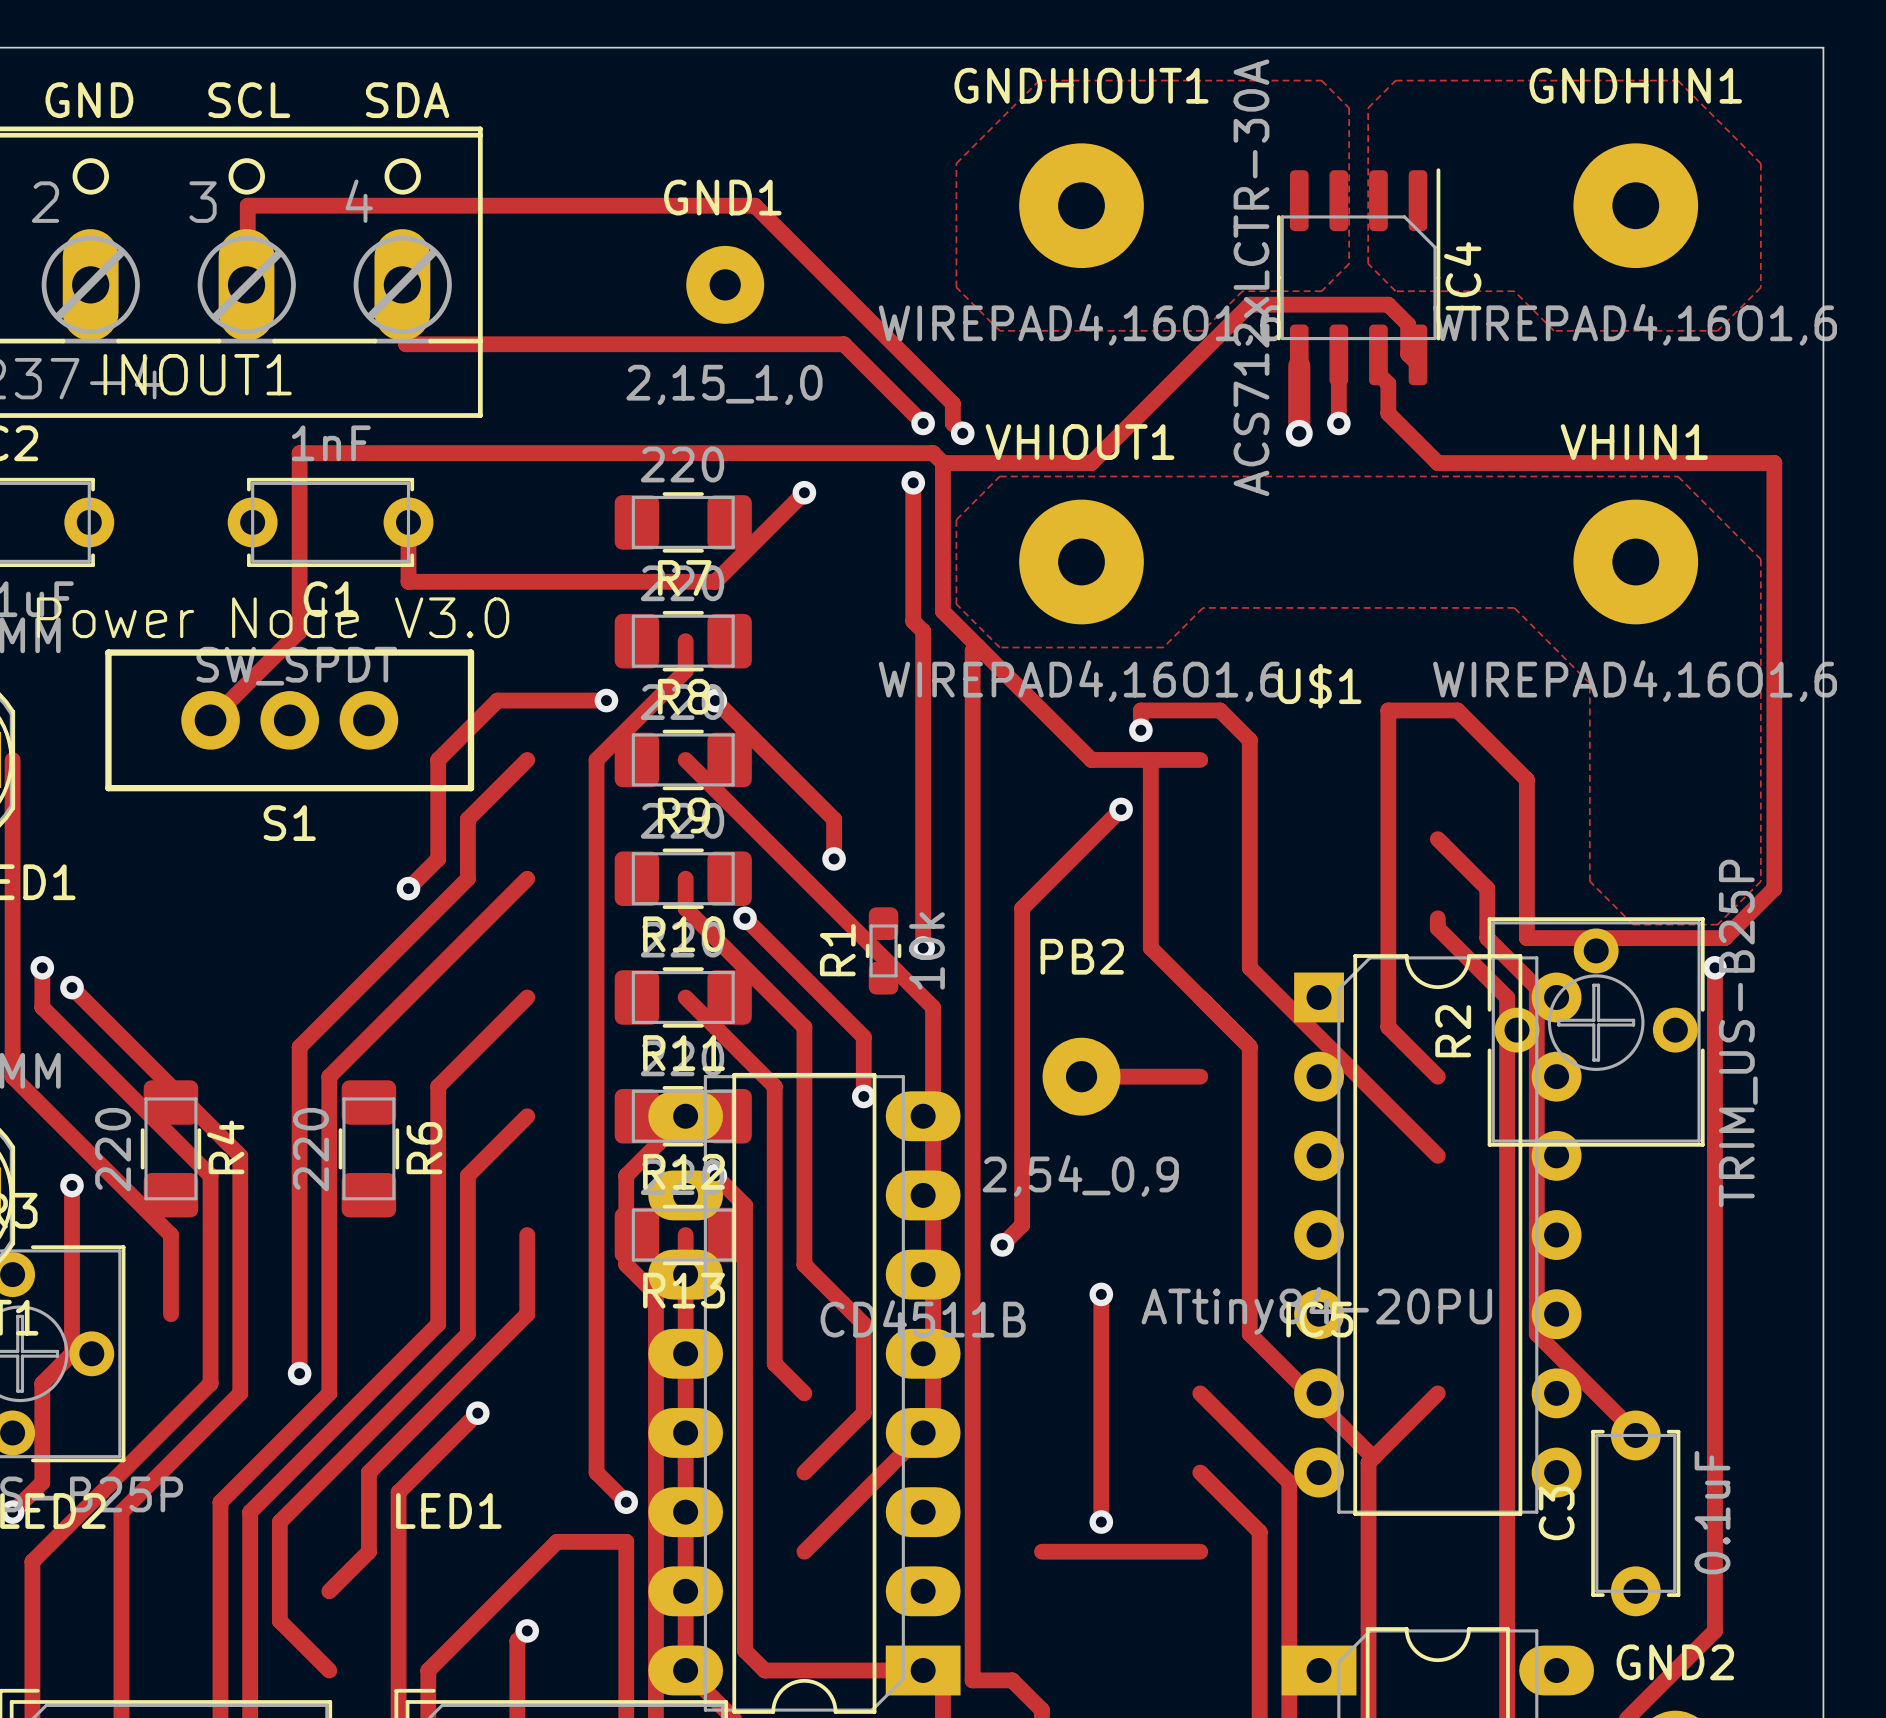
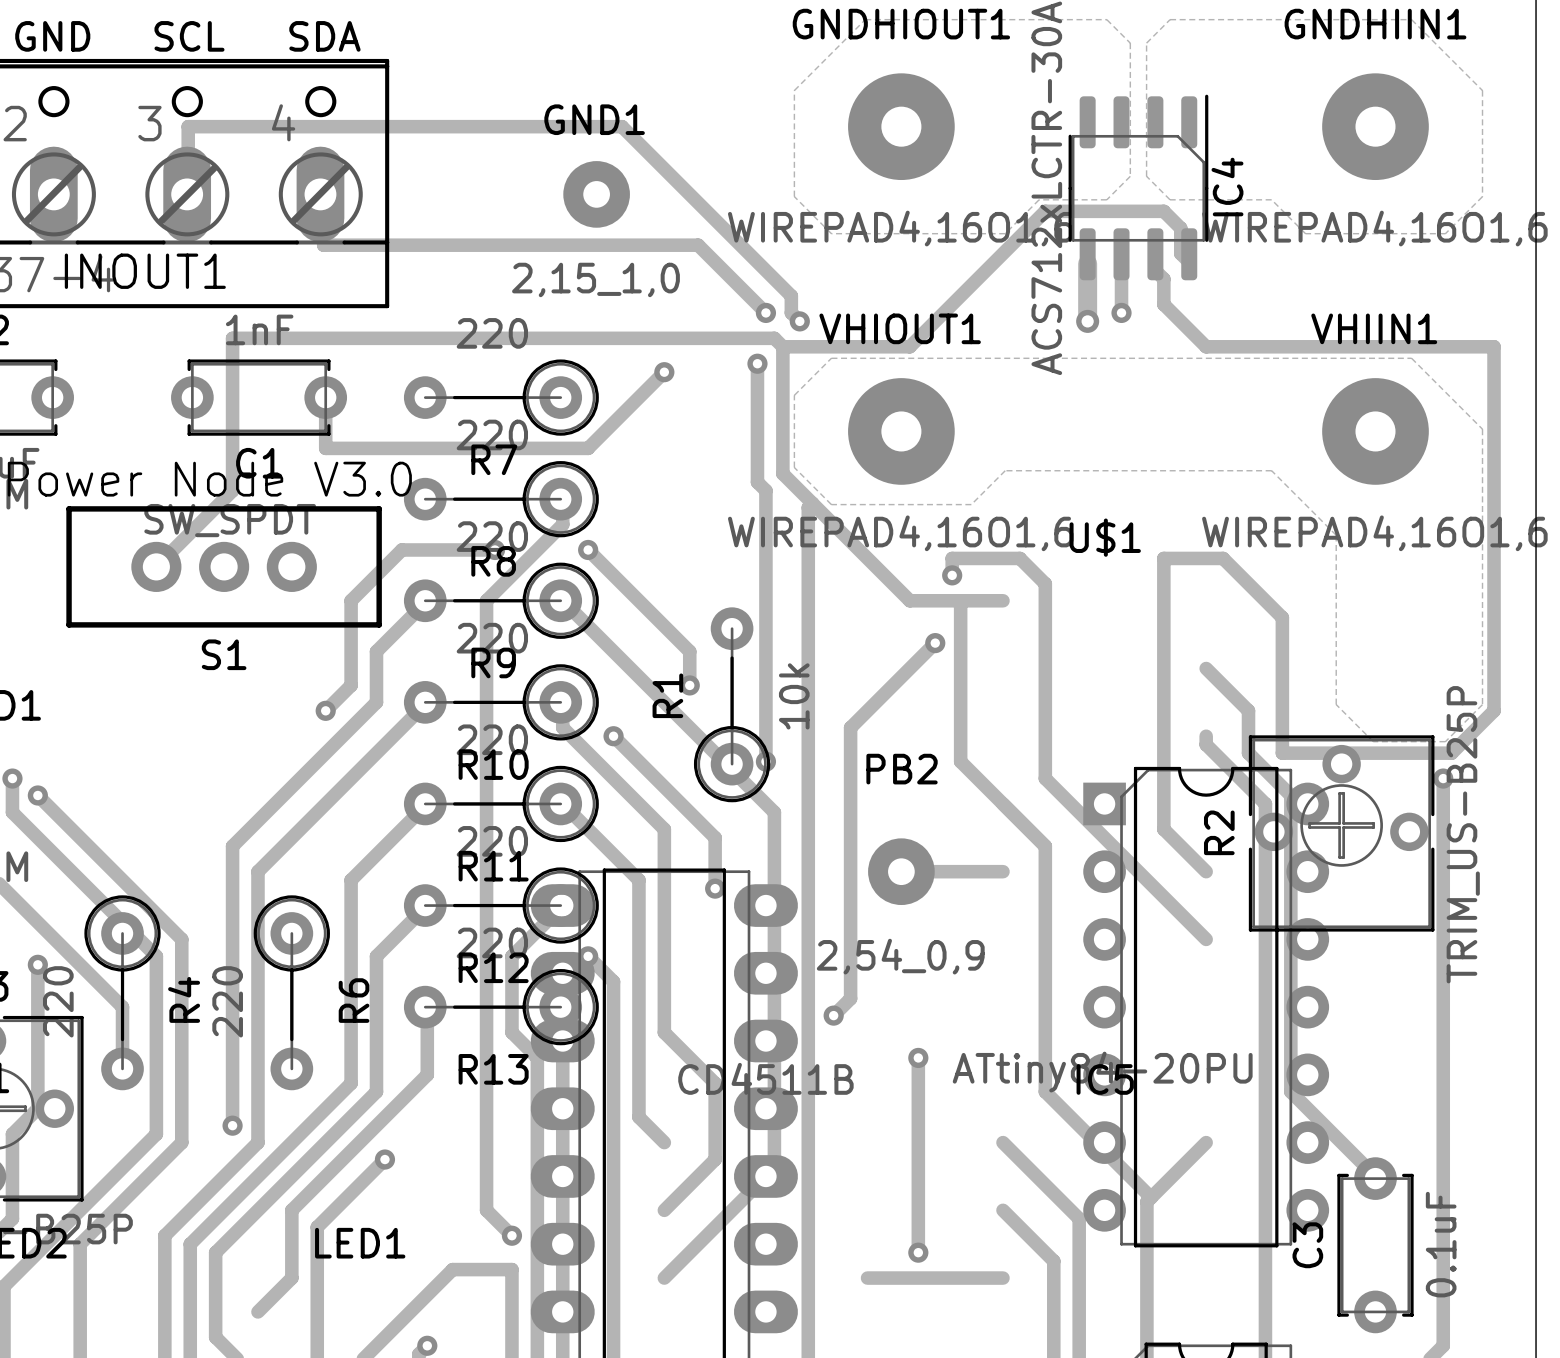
R7 footprint: [614, 492, 752, 553] -> [403, 359, 599, 436]
R8 footprint: [614, 610, 752, 672] -> [403, 461, 599, 538]
R9 footprint: [614, 729, 752, 791] -> [403, 562, 599, 639]
R10 footprint: [614, 848, 752, 909] -> [403, 664, 599, 741]
R1 footprint: [865, 907, 902, 995] -> [693, 607, 771, 803]
R11 footprint: [614, 967, 752, 1028] -> [403, 765, 599, 843]
R4 footprint: [140, 1080, 202, 1218] -> [84, 895, 161, 1091]
R6 footprint: [338, 1080, 400, 1218] -> [253, 895, 330, 1091]
R12 footprint: [614, 1086, 752, 1147] -> [403, 867, 599, 944]
R13 footprint: [614, 1204, 752, 1266] -> [403, 969, 599, 1046]

